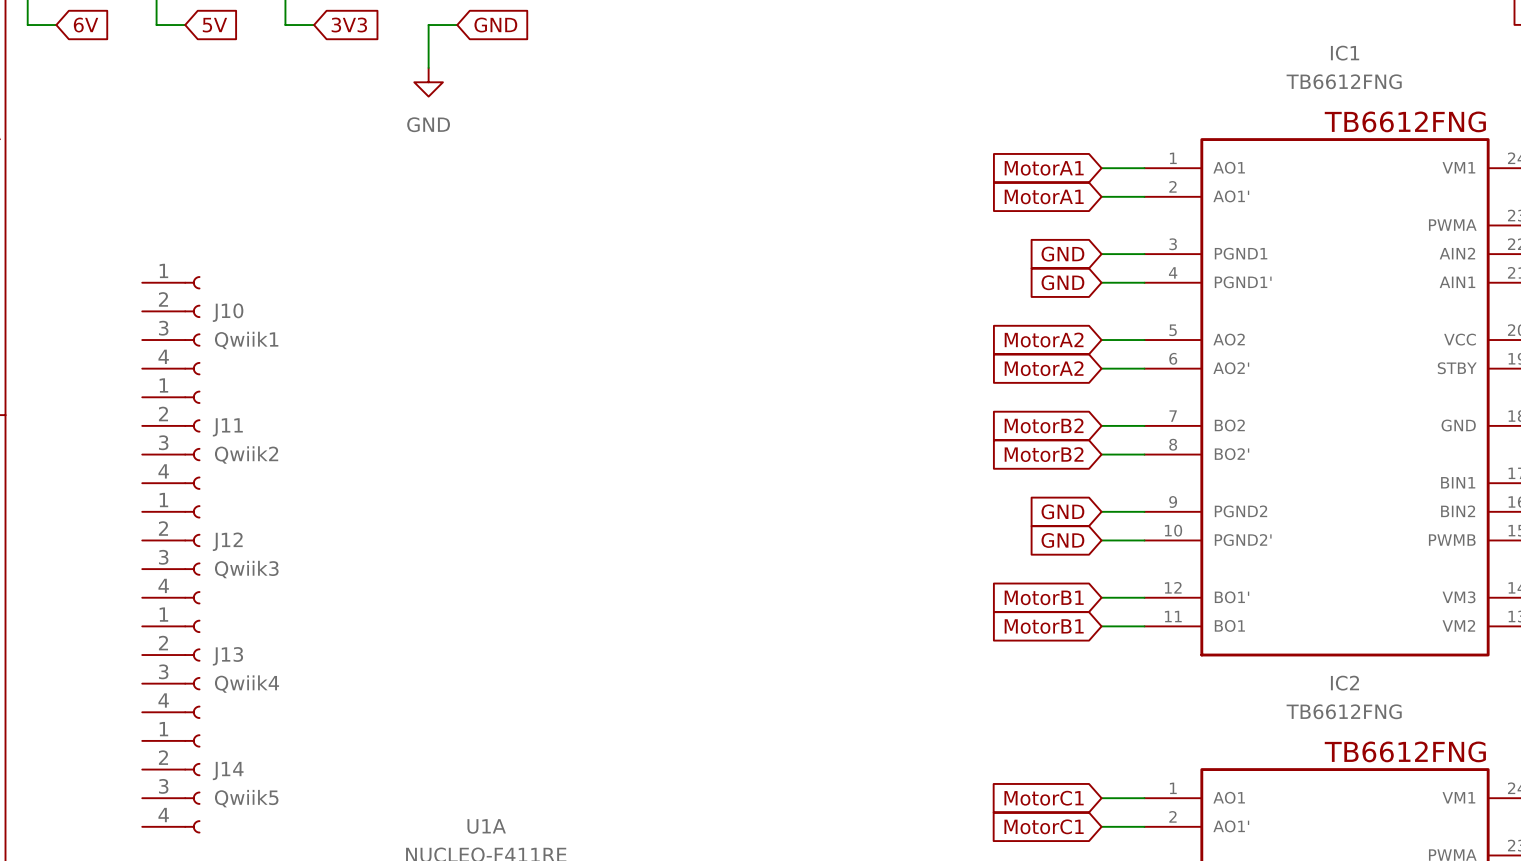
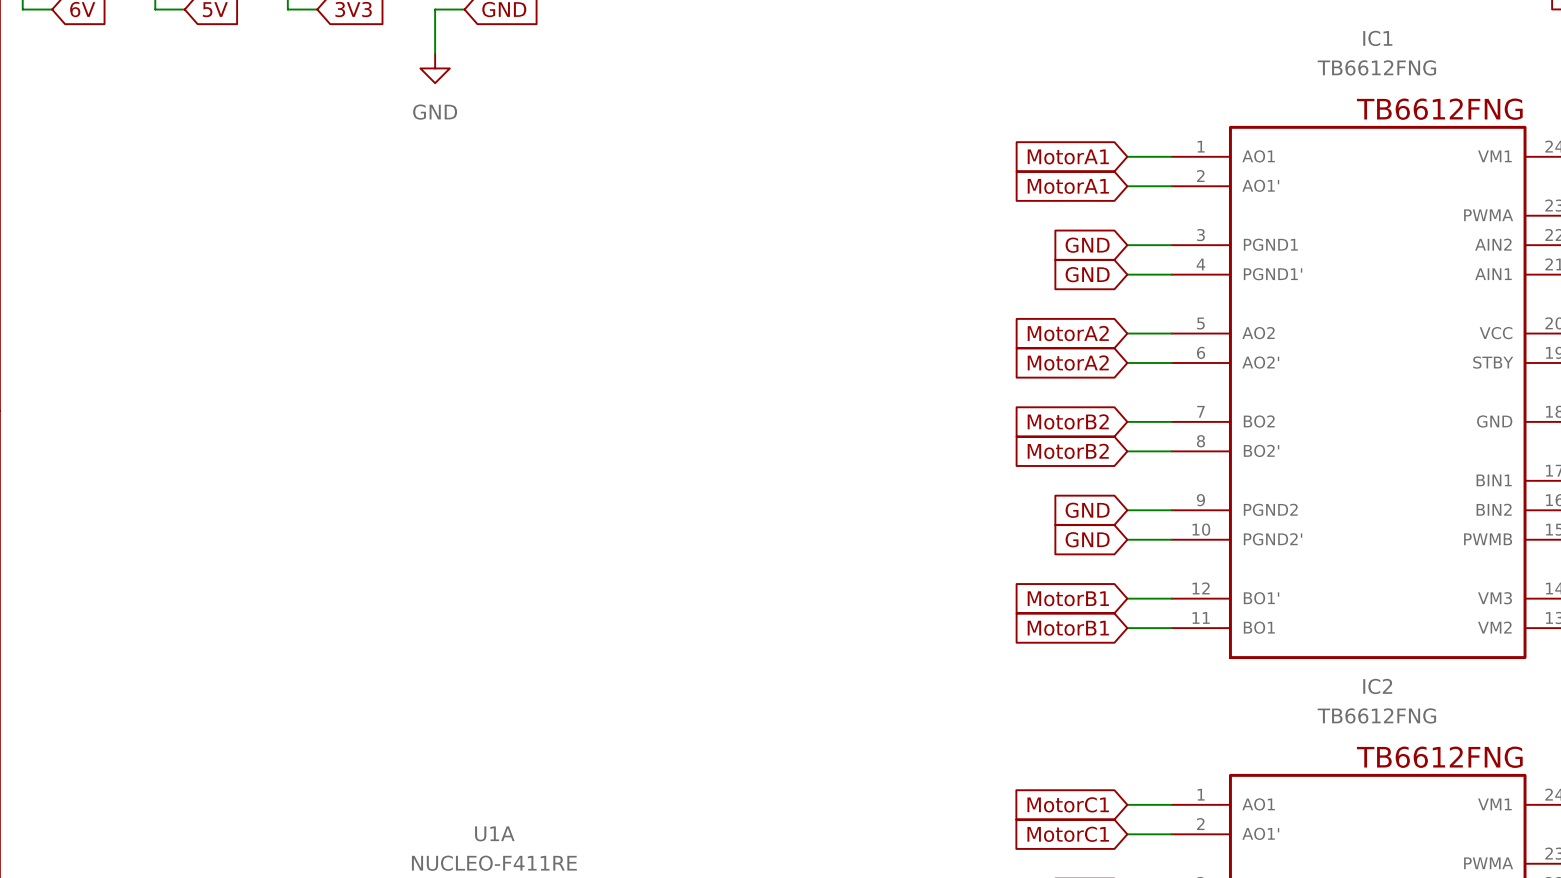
J10: Qwiik1 (171, 325) -> none
J11: Qwiik2 (171, 440) -> none
J12: Qwiik3 (171, 554) -> none
J13: Qwiik4 (171, 669) -> none
J14: Qwiik5 (171, 783) -> none

